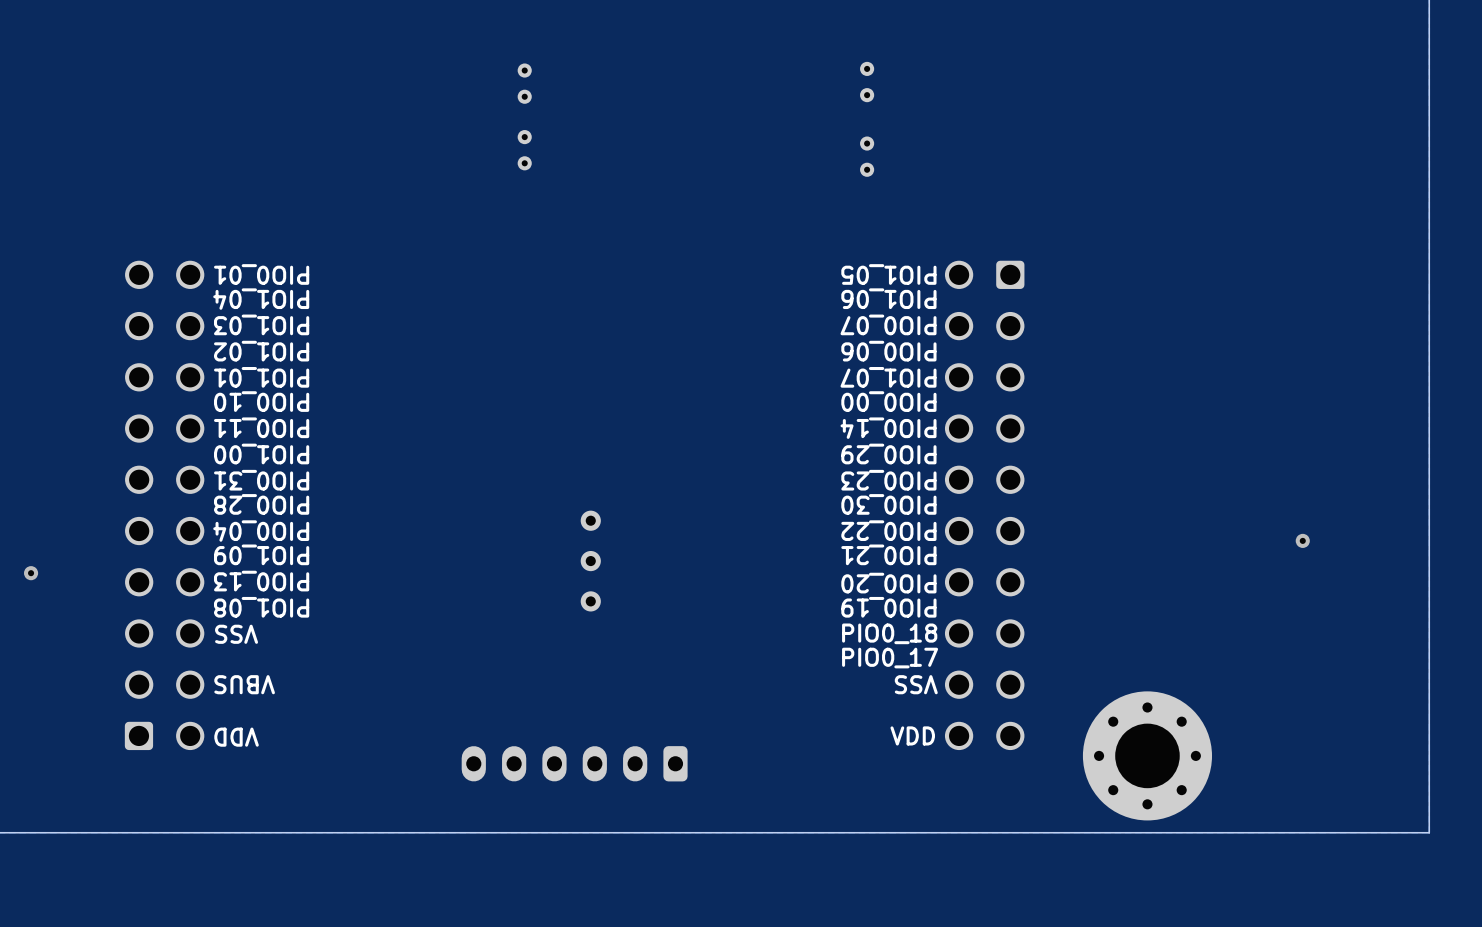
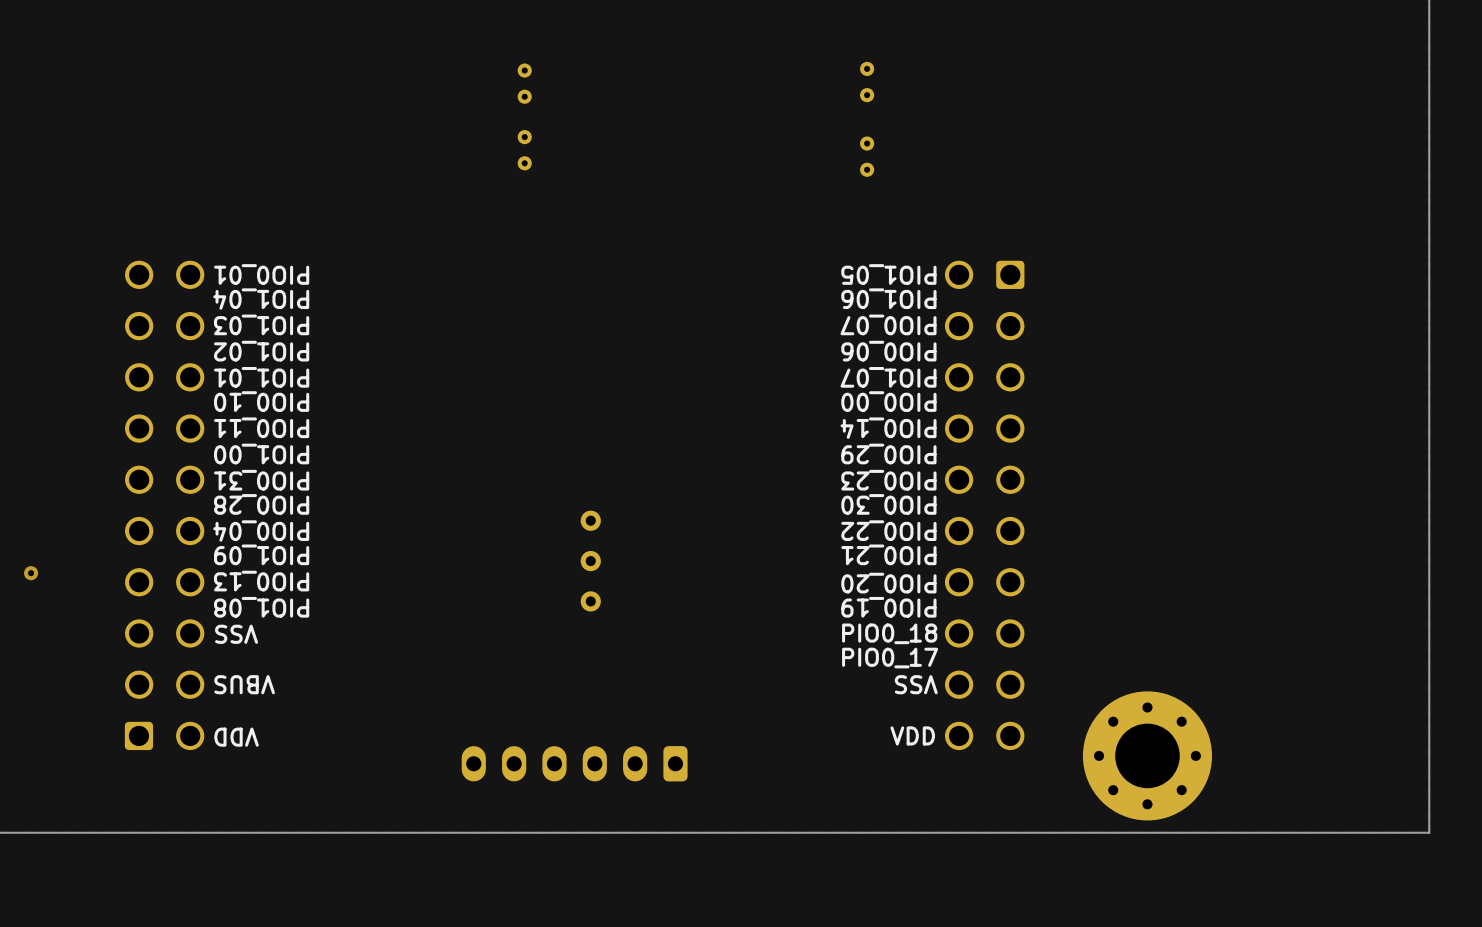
via: (1302, 540) -> none

